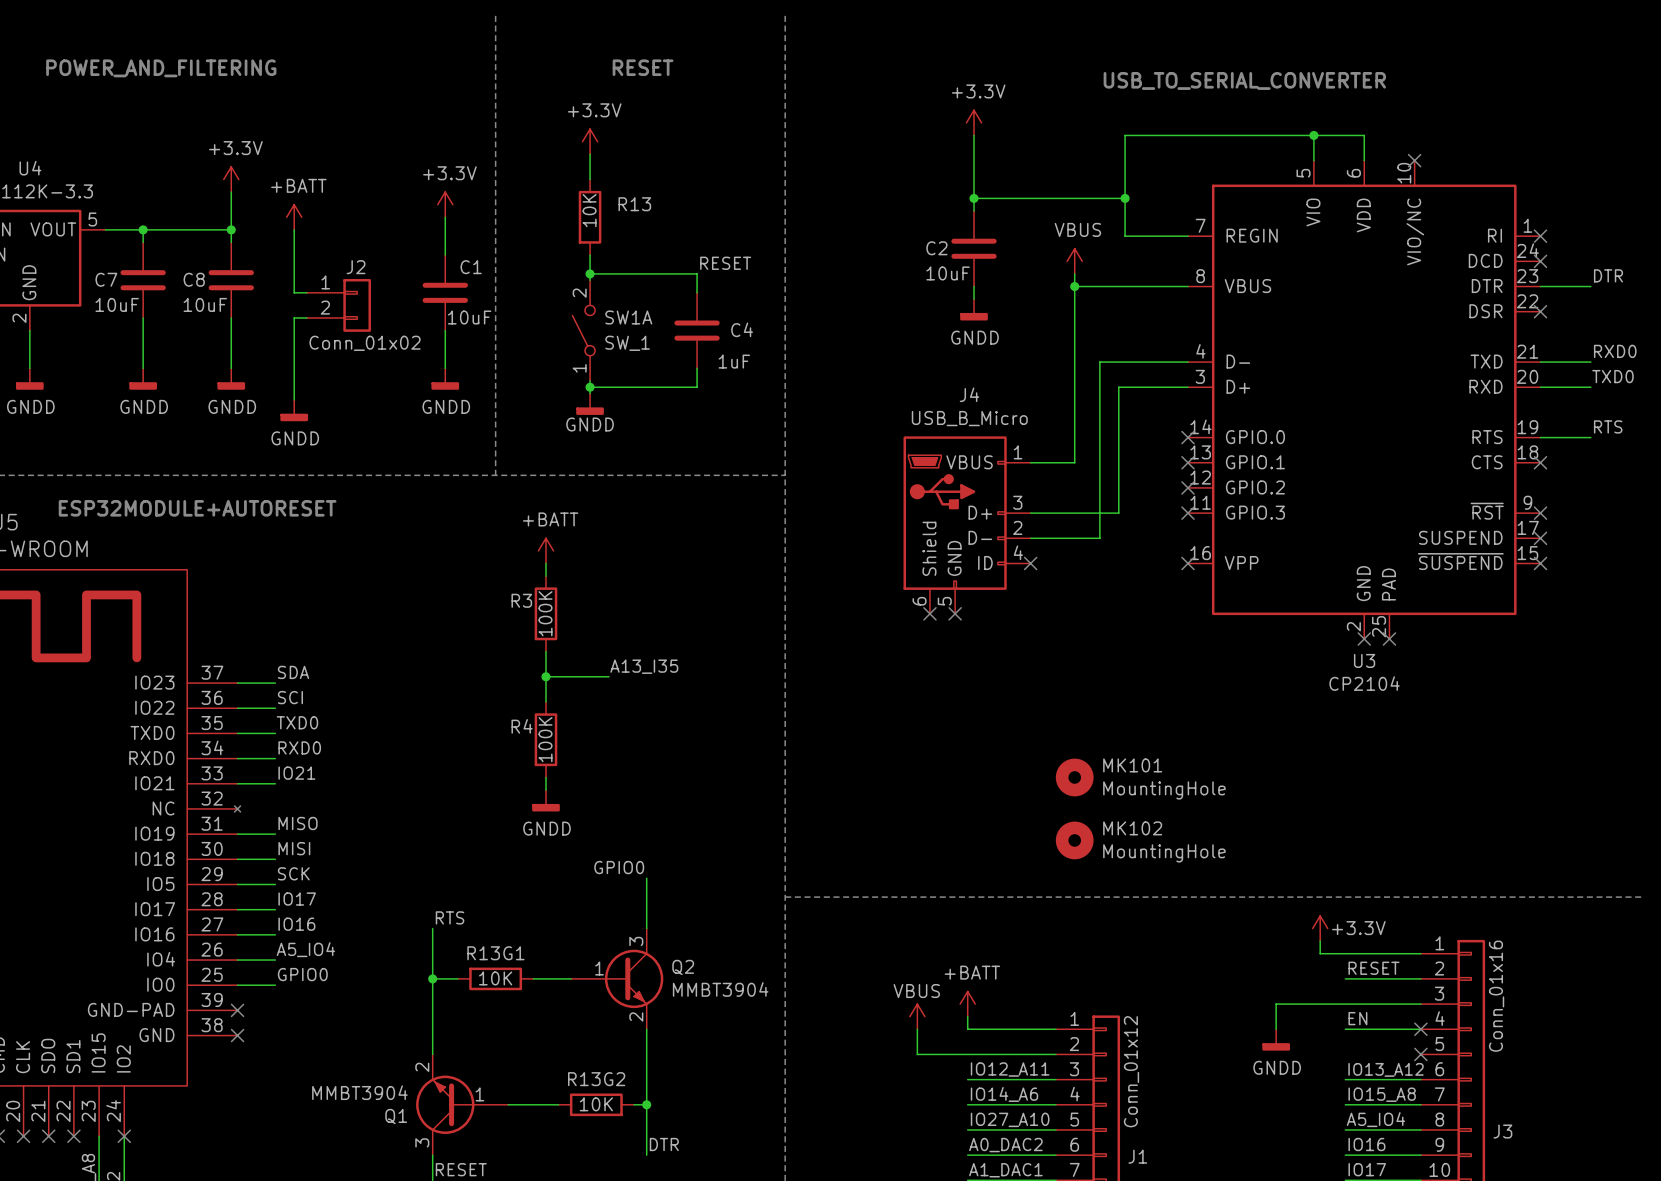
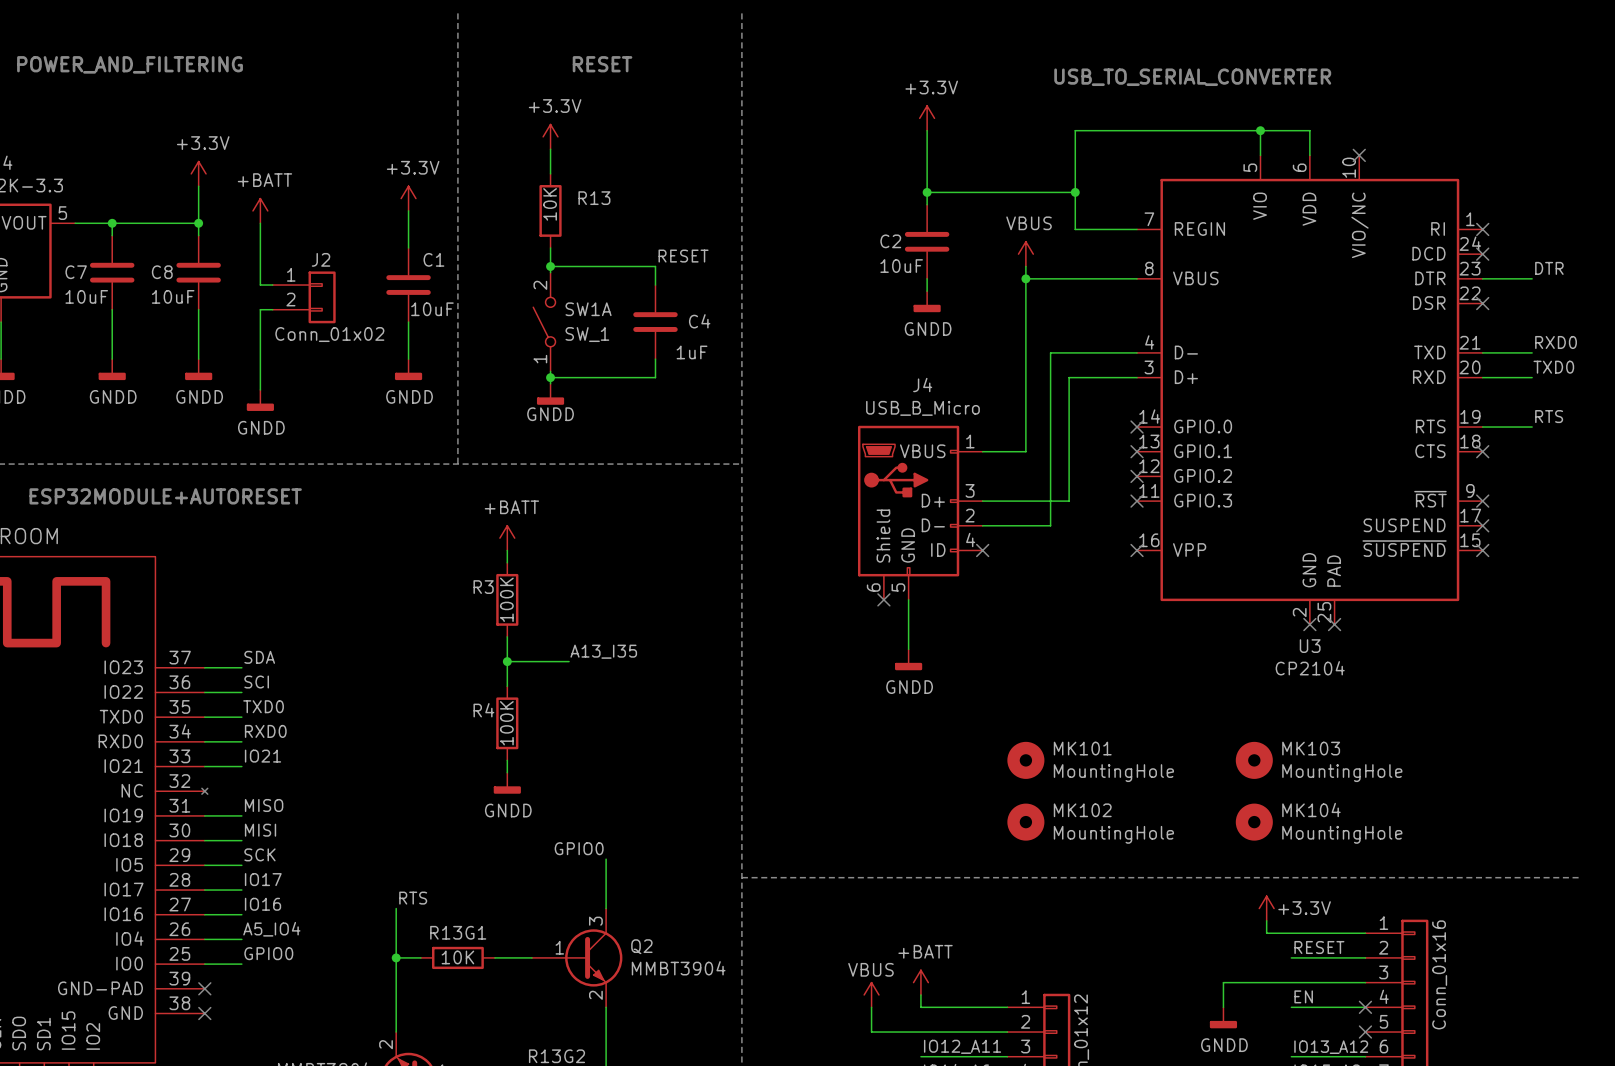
wire: none -> (908, 599) (908, 649)
no-connect mark: (955, 613) -> none
power symbol: none -> GNDD (908, 659)
MK103: none -> MountingHole (1254, 760)
MK104: none -> MountingHole (1254, 822)

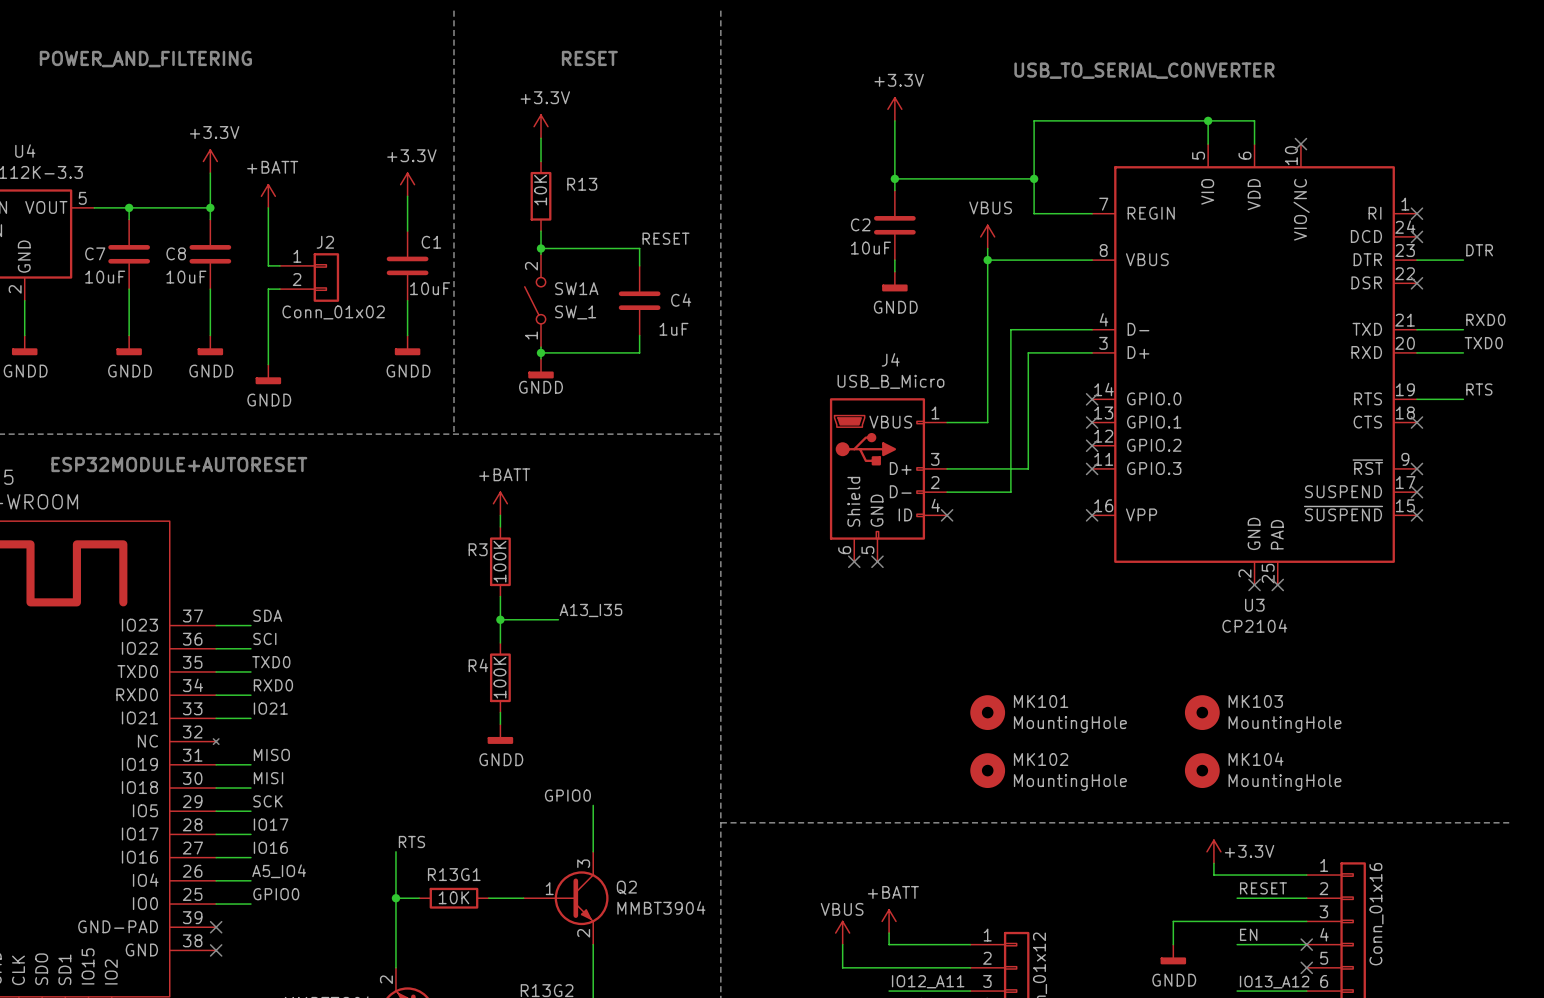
wire: (908, 599) (908, 649) -> none
no-connect mark: none -> (877, 561)
power symbol: GNDD (908, 659) -> none

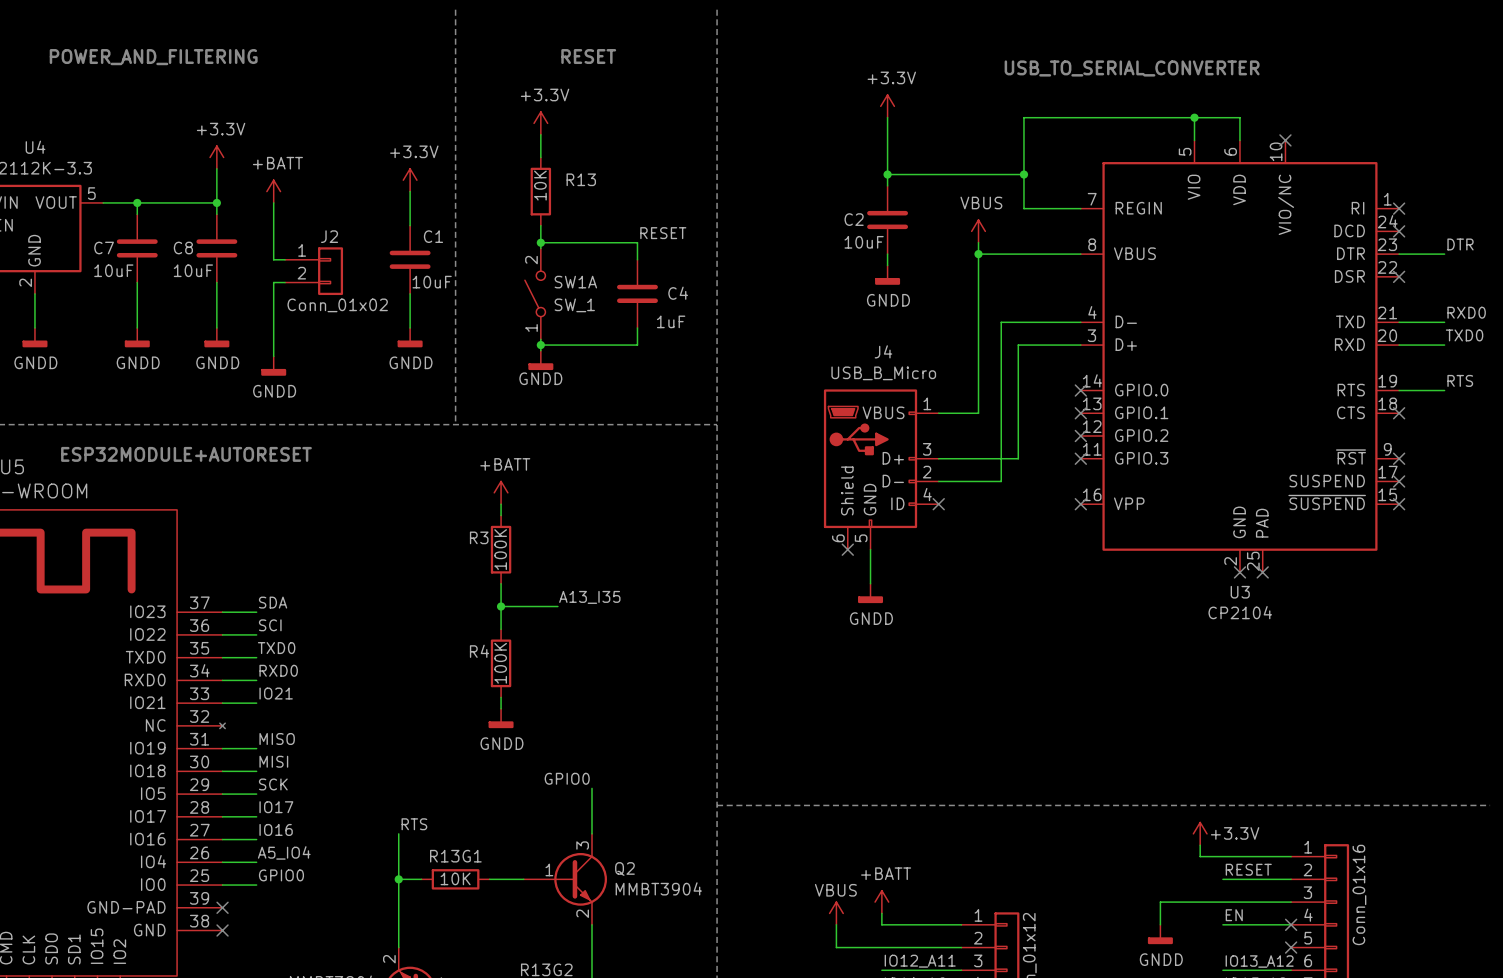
wire: none -> (870, 549) (870, 583)
no-connect mark: (877, 561) -> none
power symbol: none -> GNDD (870, 593)
MK101: MountingHole (987, 712) -> none
MK103: MountingHole (1202, 712) -> none
MK102: MountingHole (987, 770) -> none
MK104: MountingHole (1202, 770) -> none

